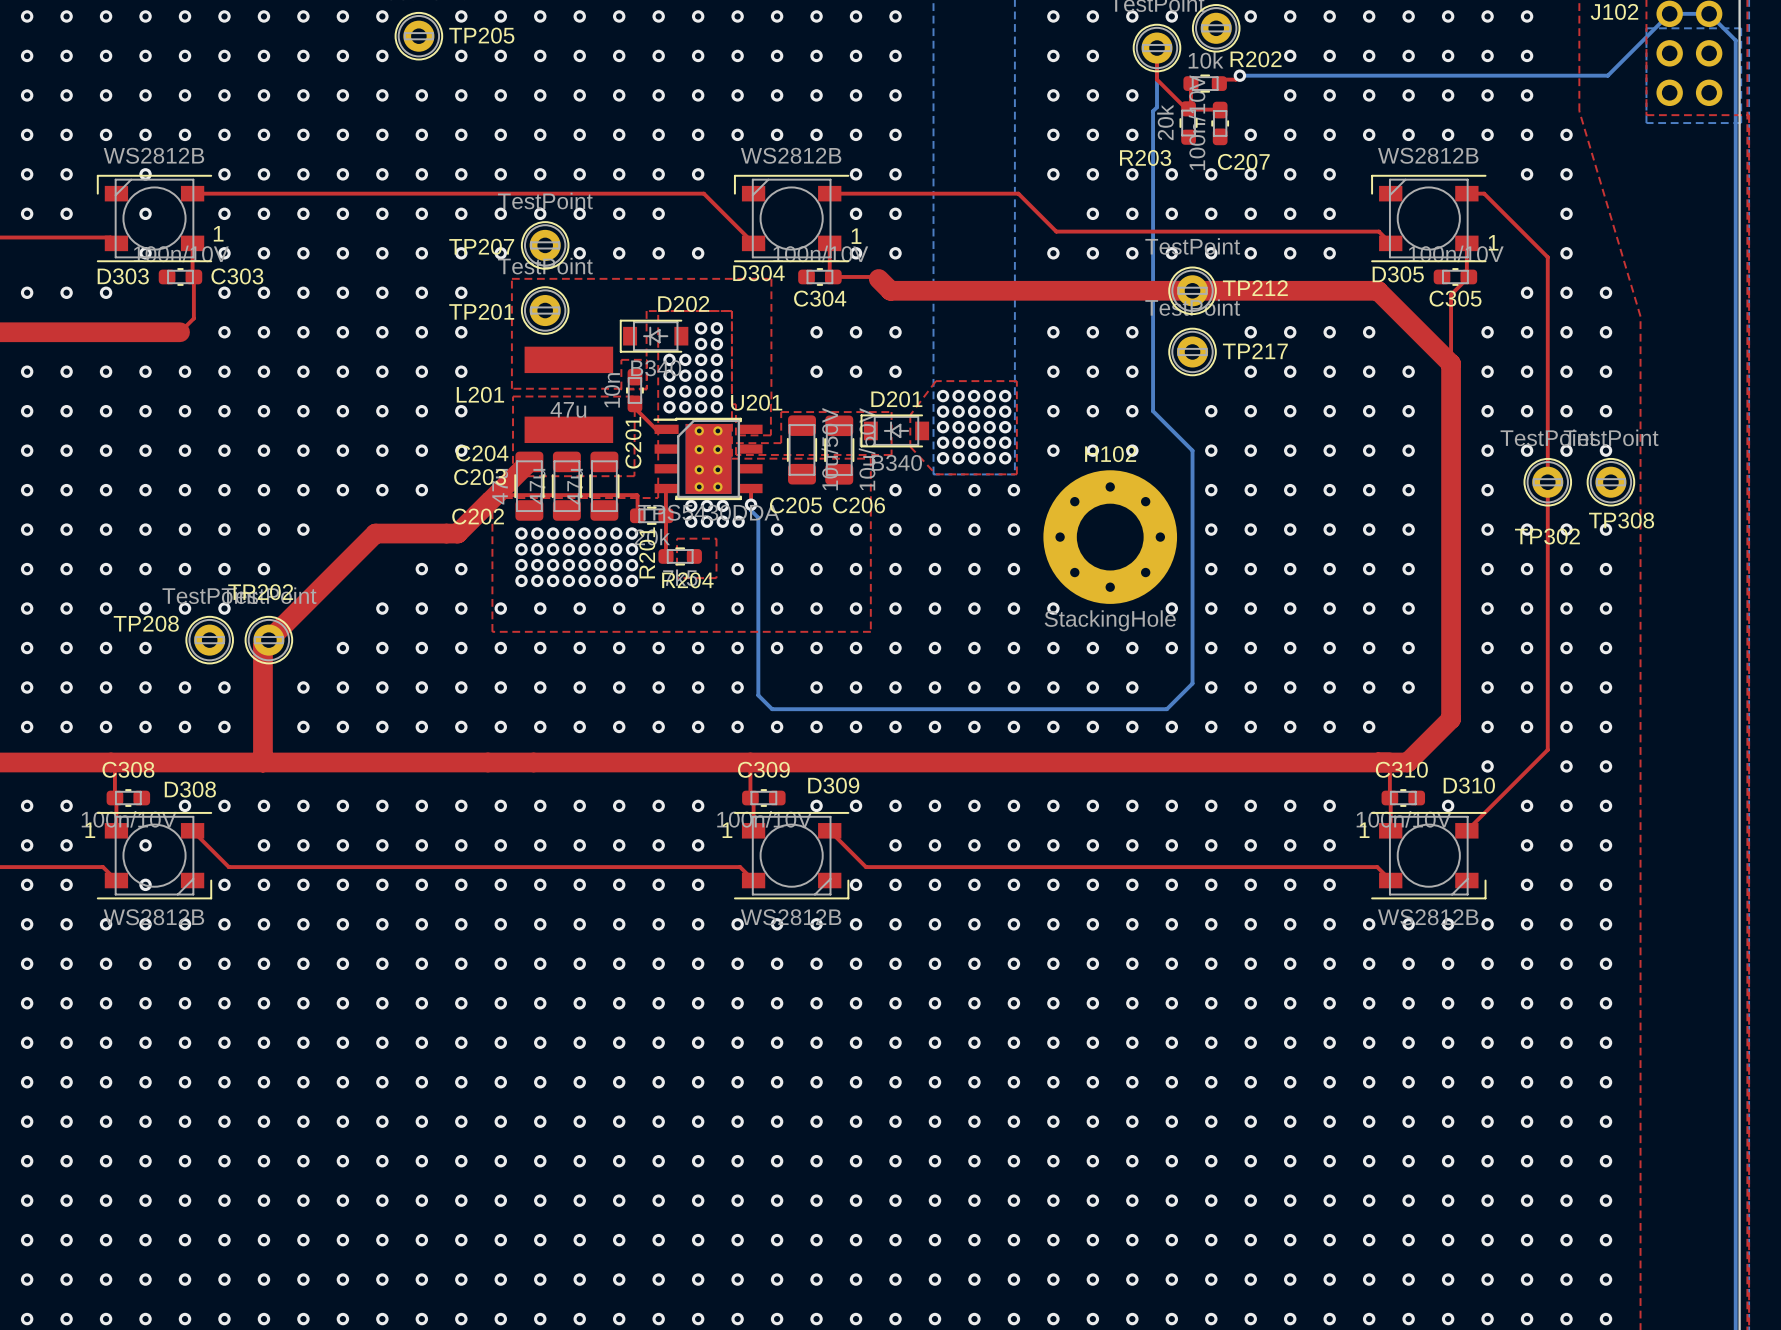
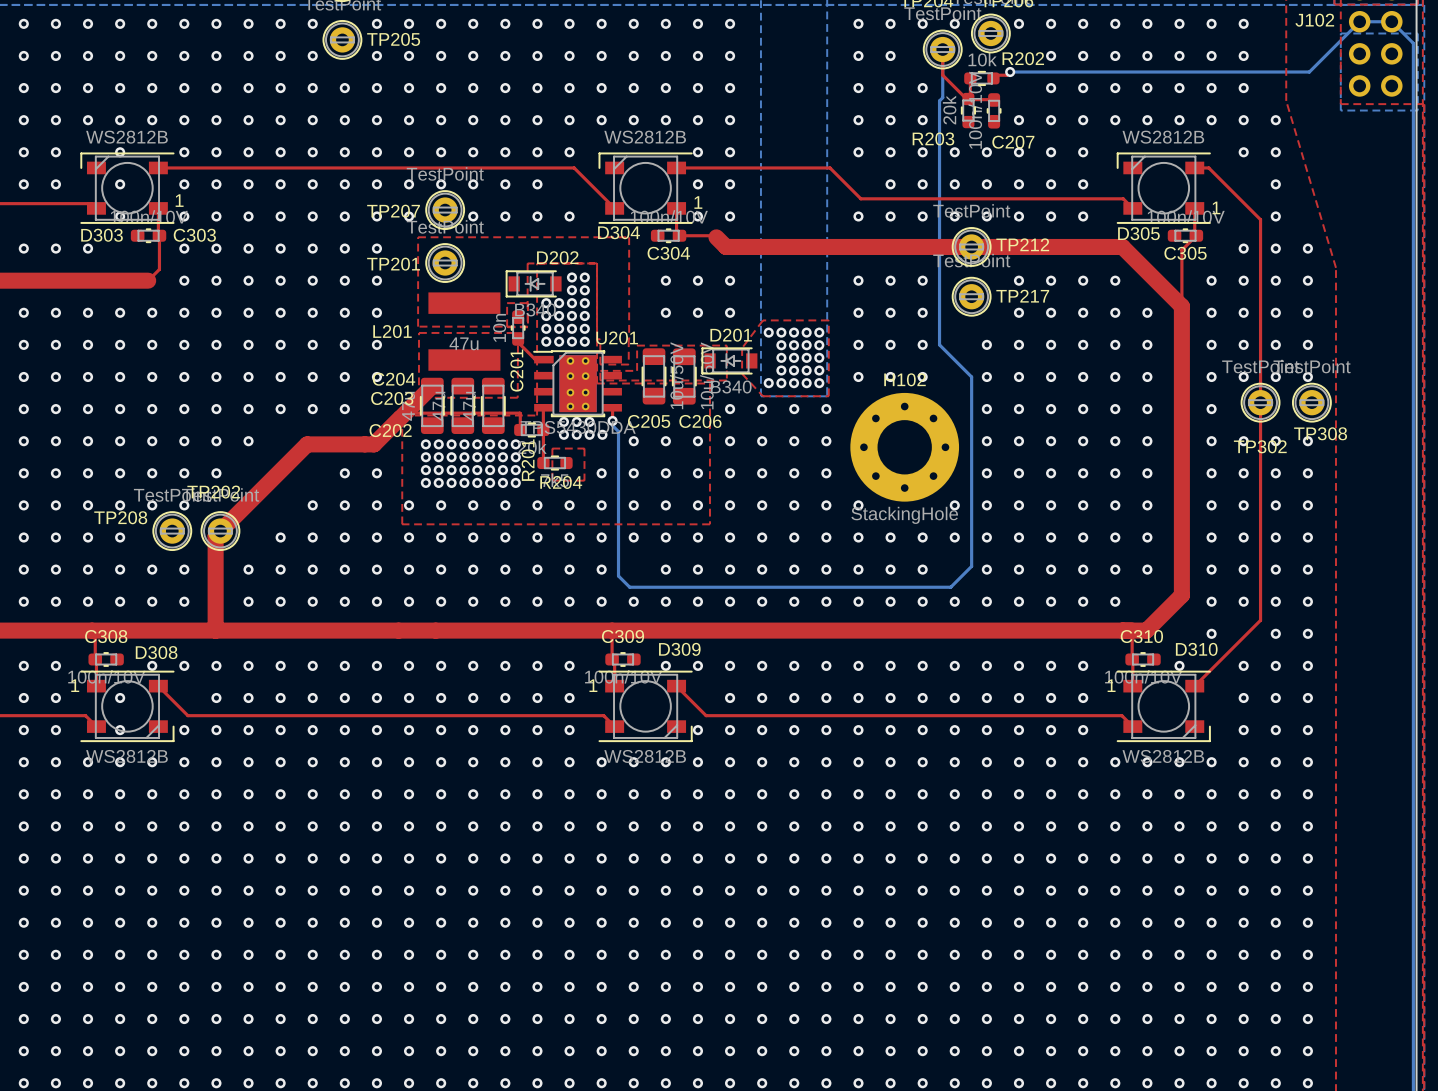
via: (943, 411) -> none
via: (943, 427) -> none
via: (943, 442) -> none

